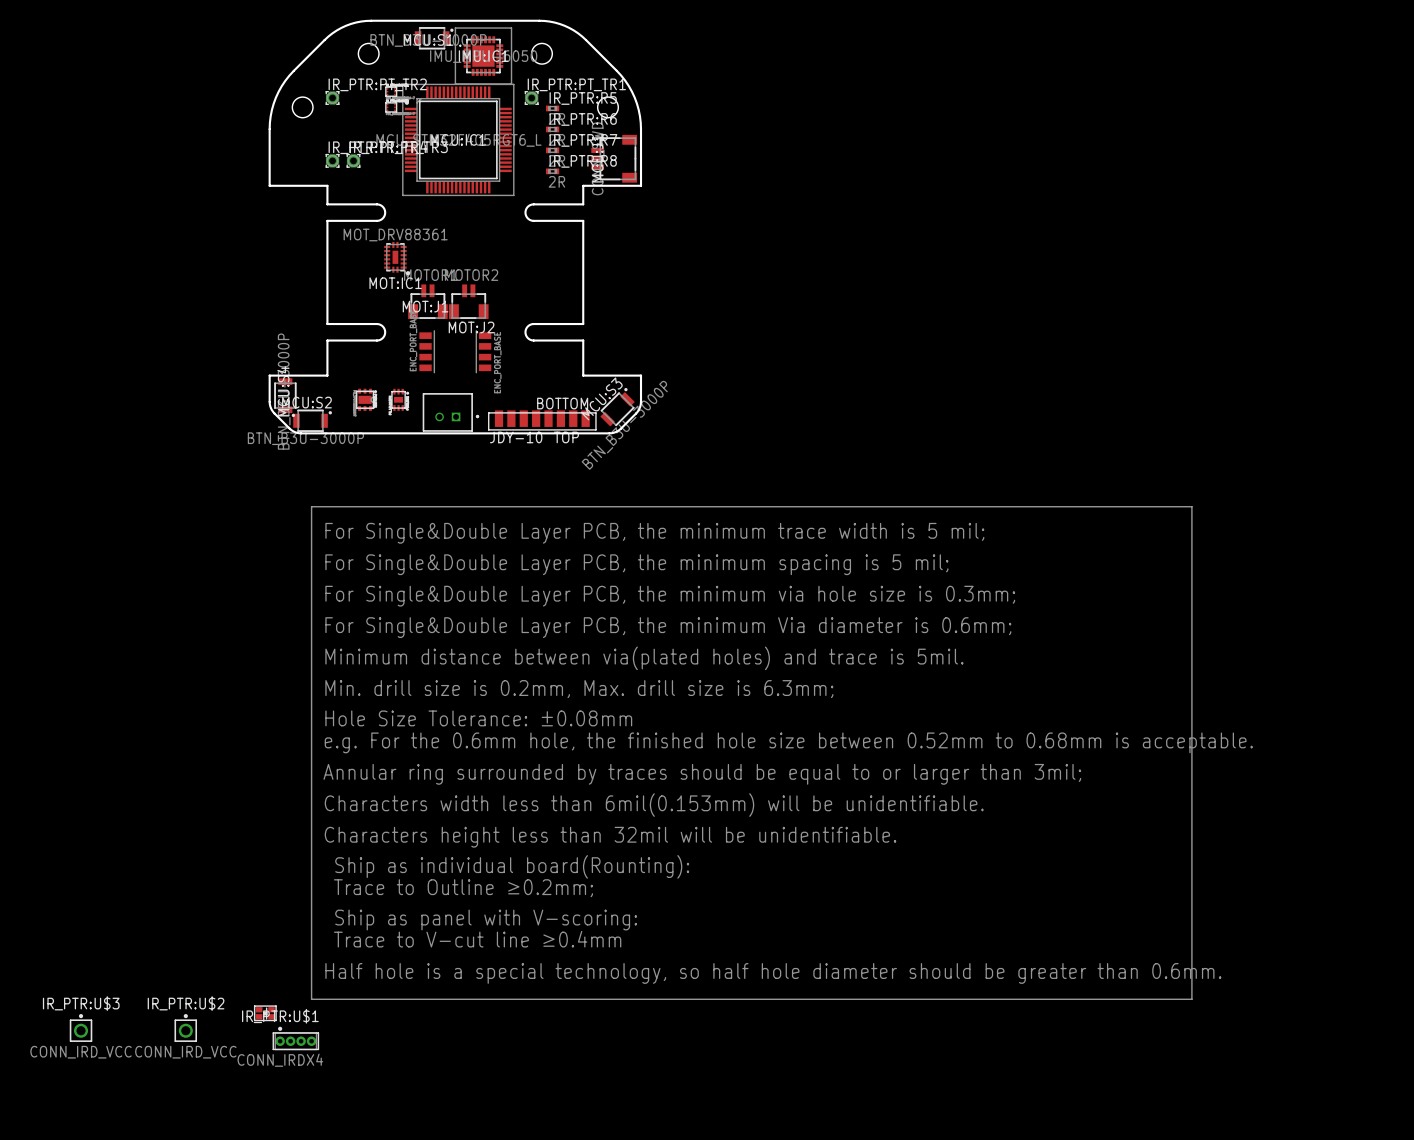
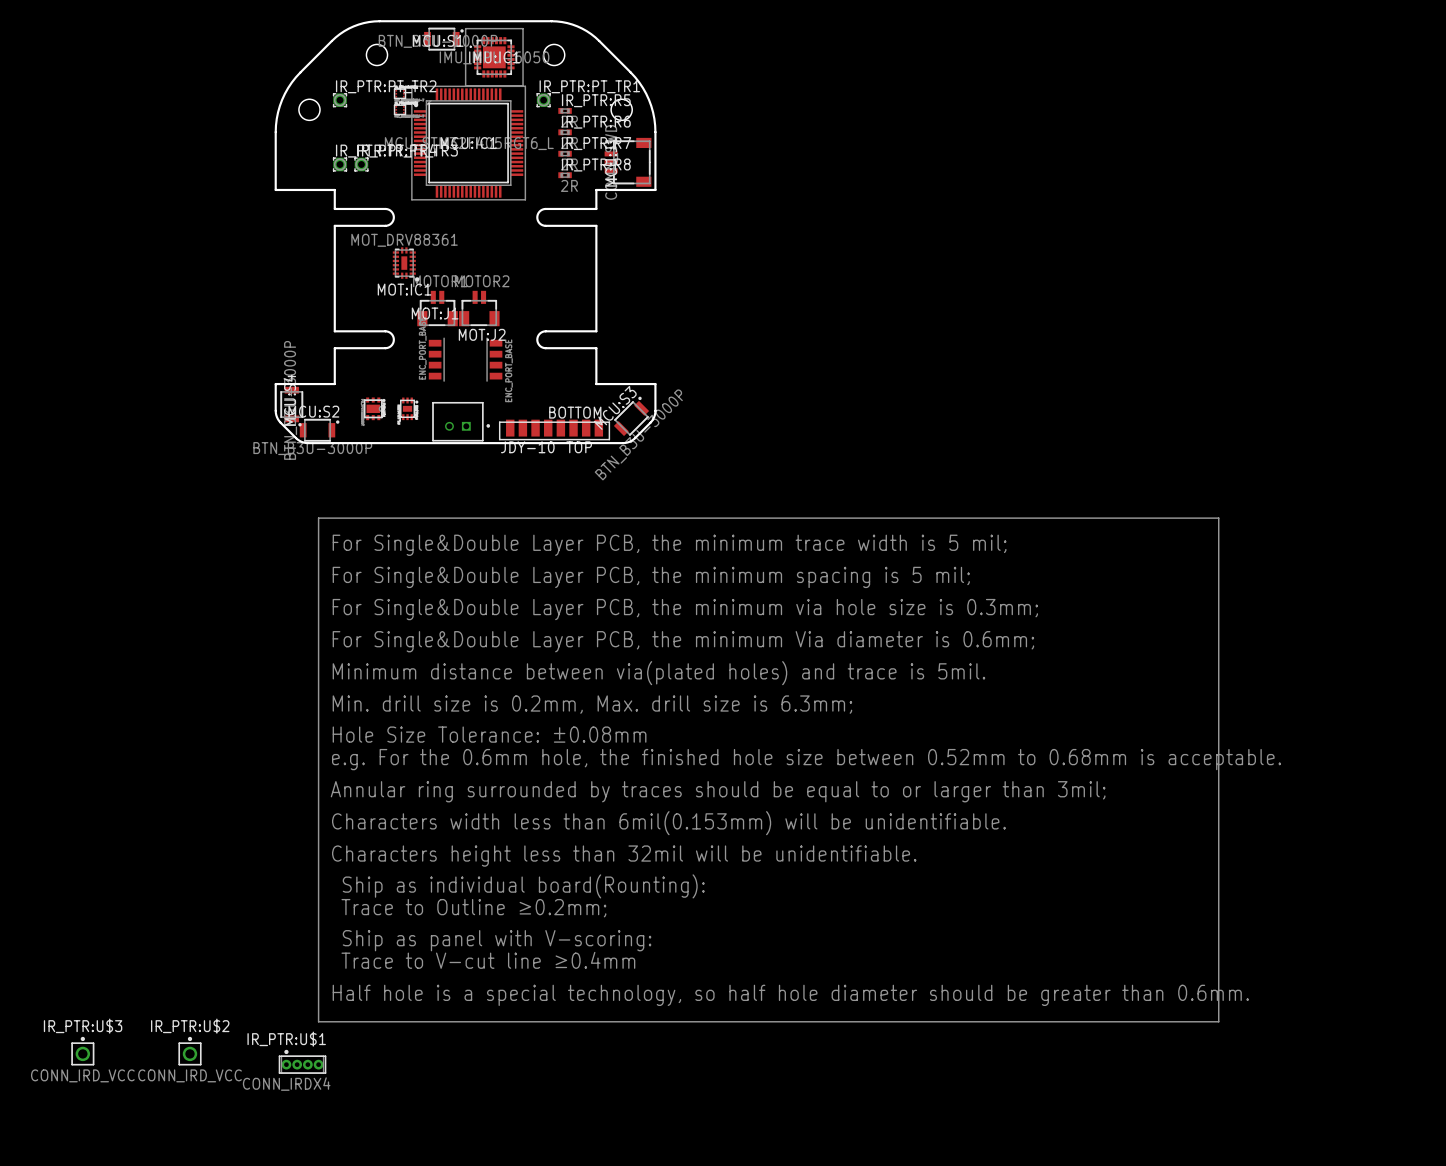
part: (265, 1013) -> none

